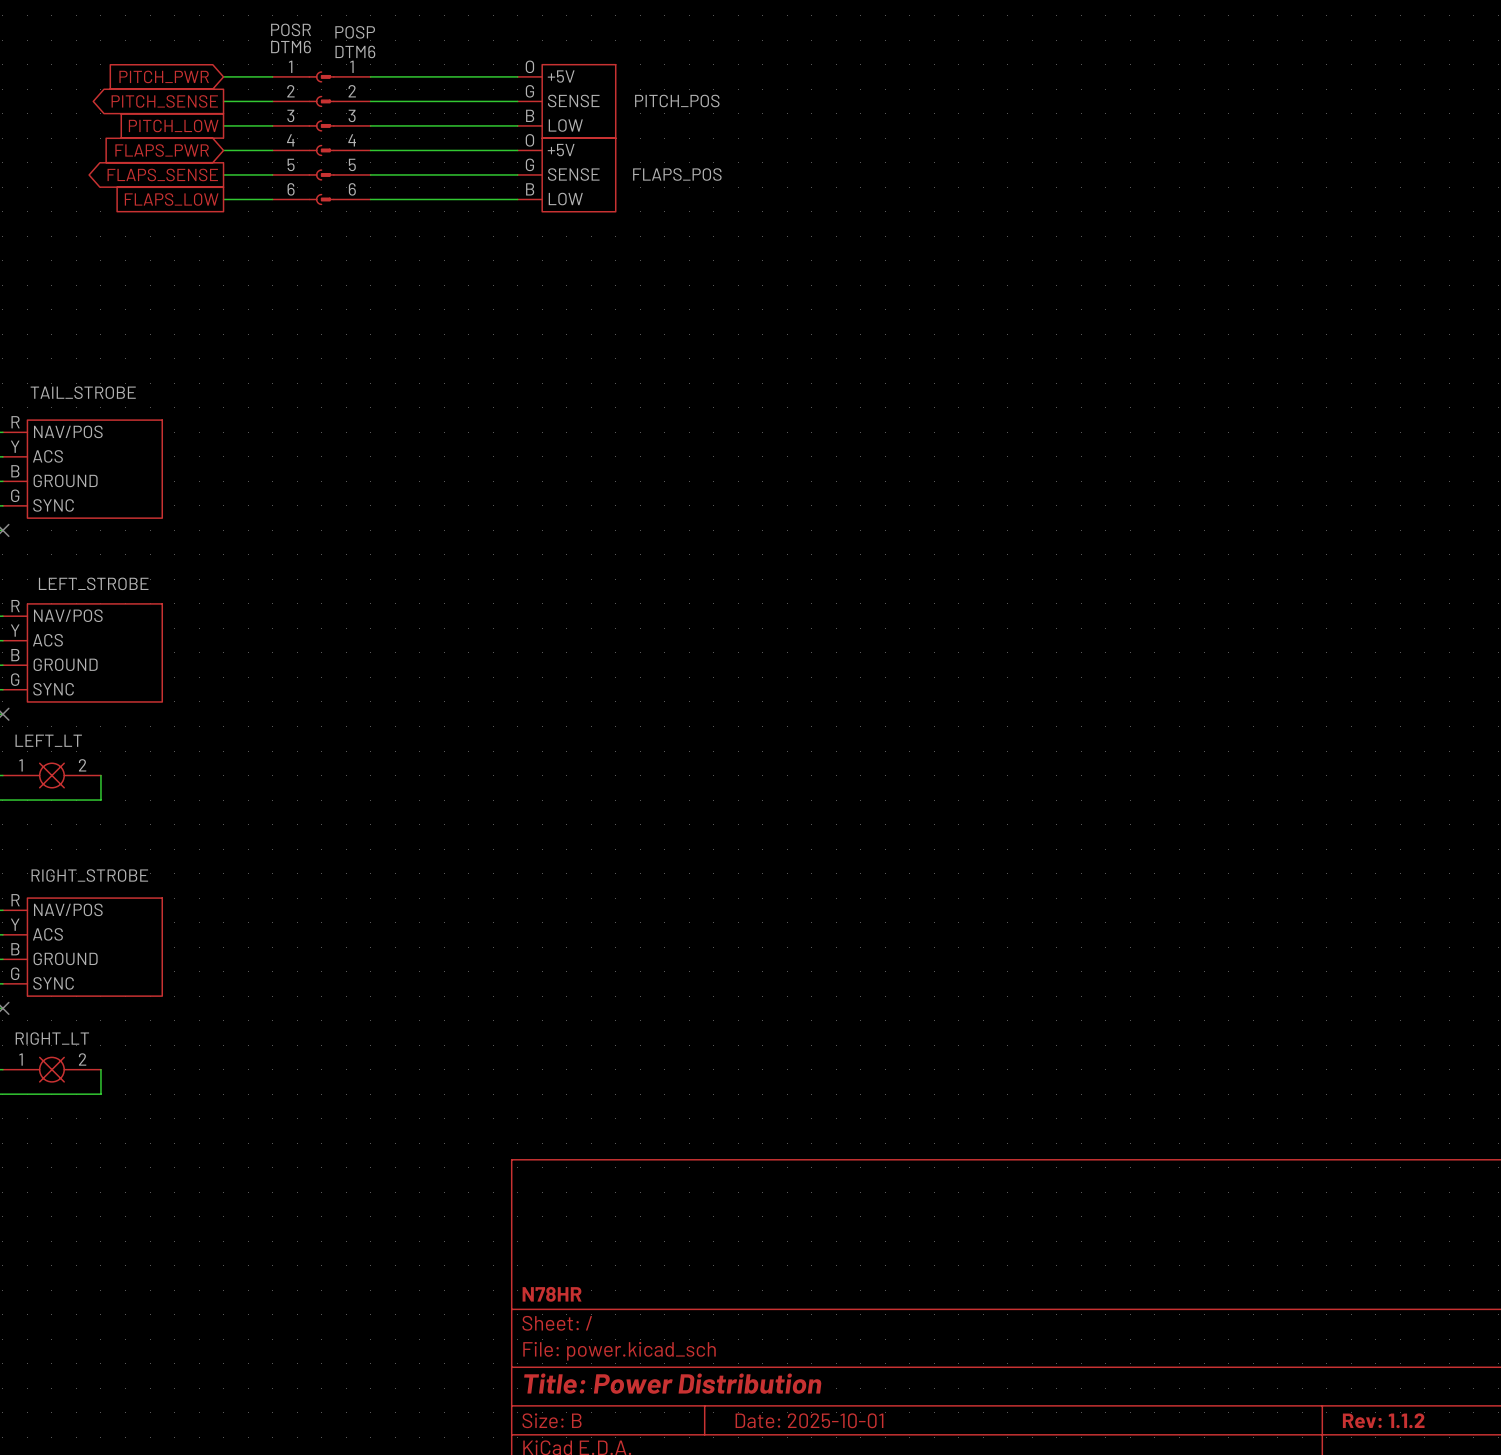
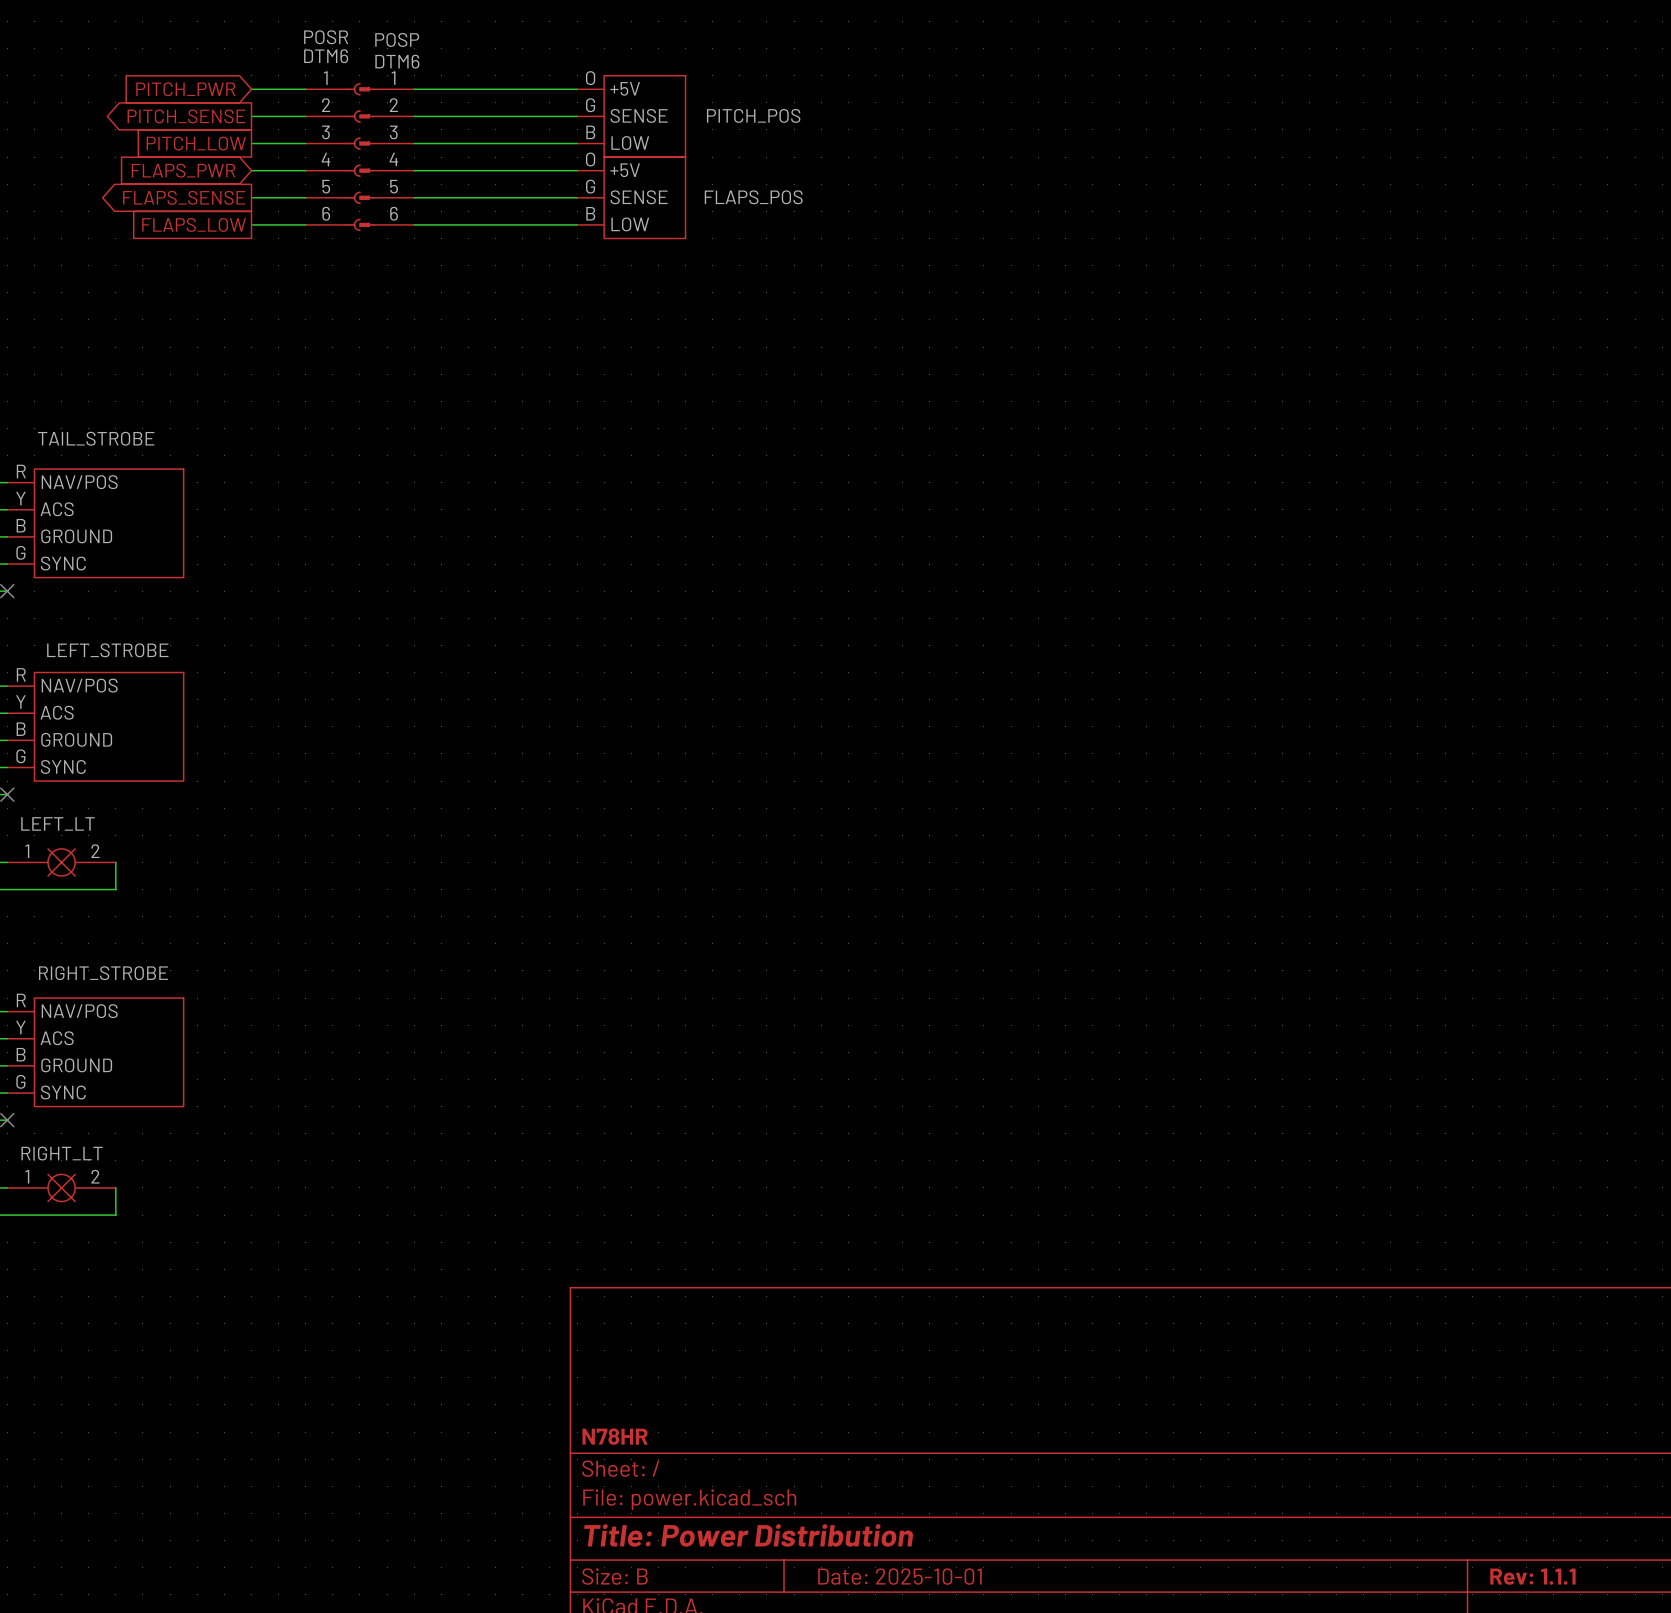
title block: Rev: 1.1.2 (1383, 1420) -> Rev: 1.1.1 (1532, 1576)

